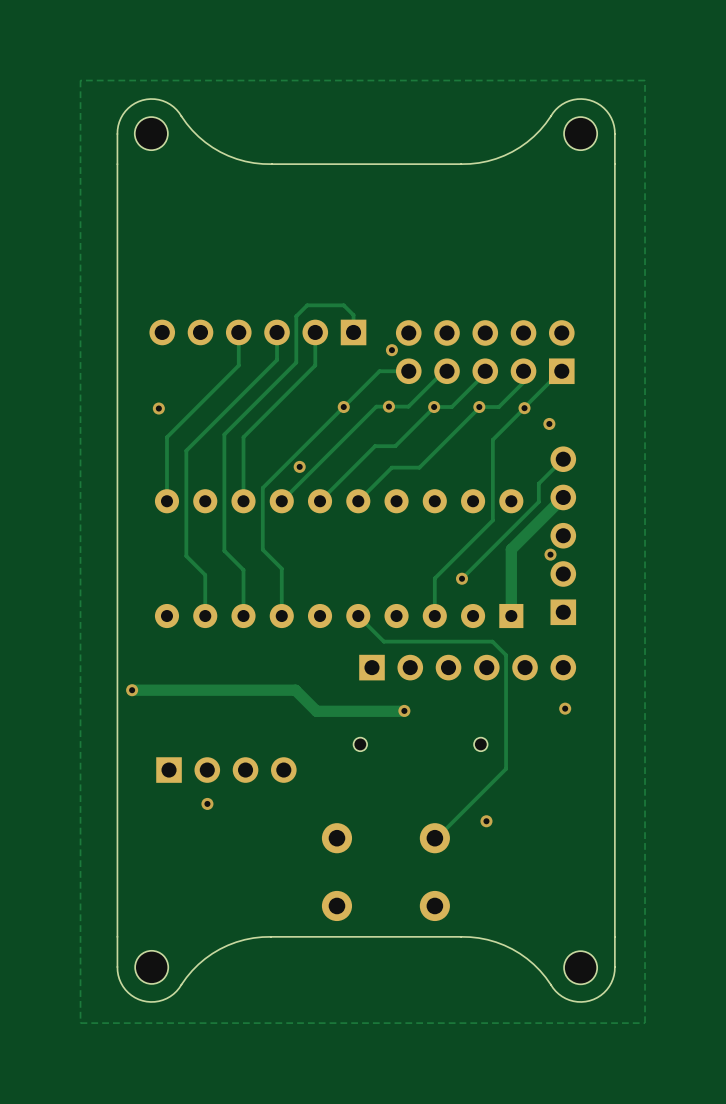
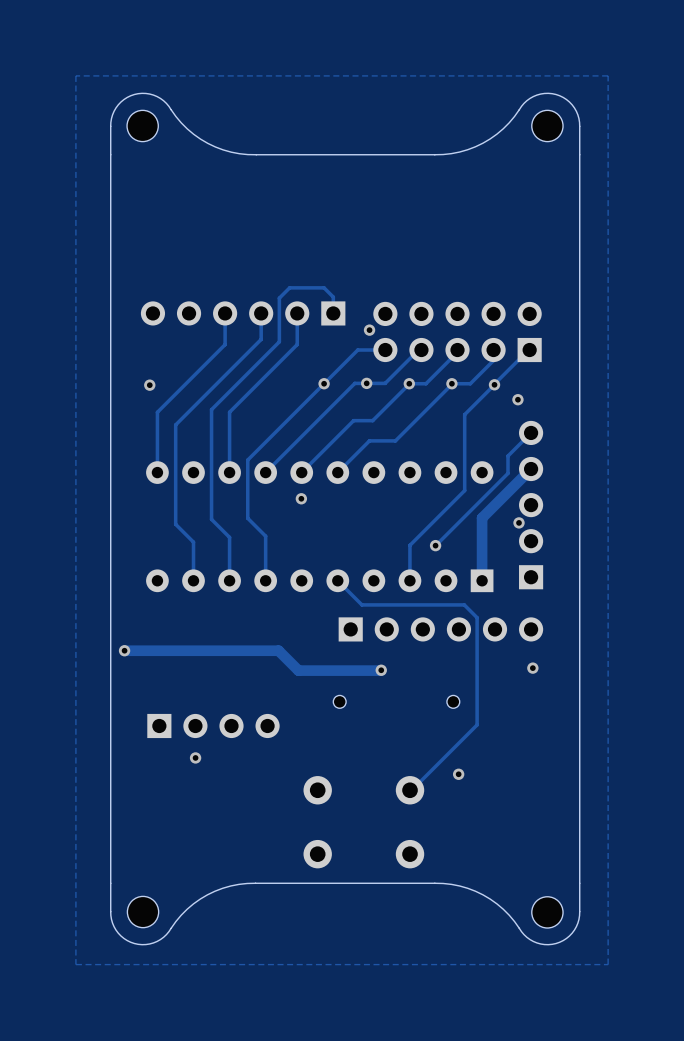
via position: (299, 466) -> (301, 498)

